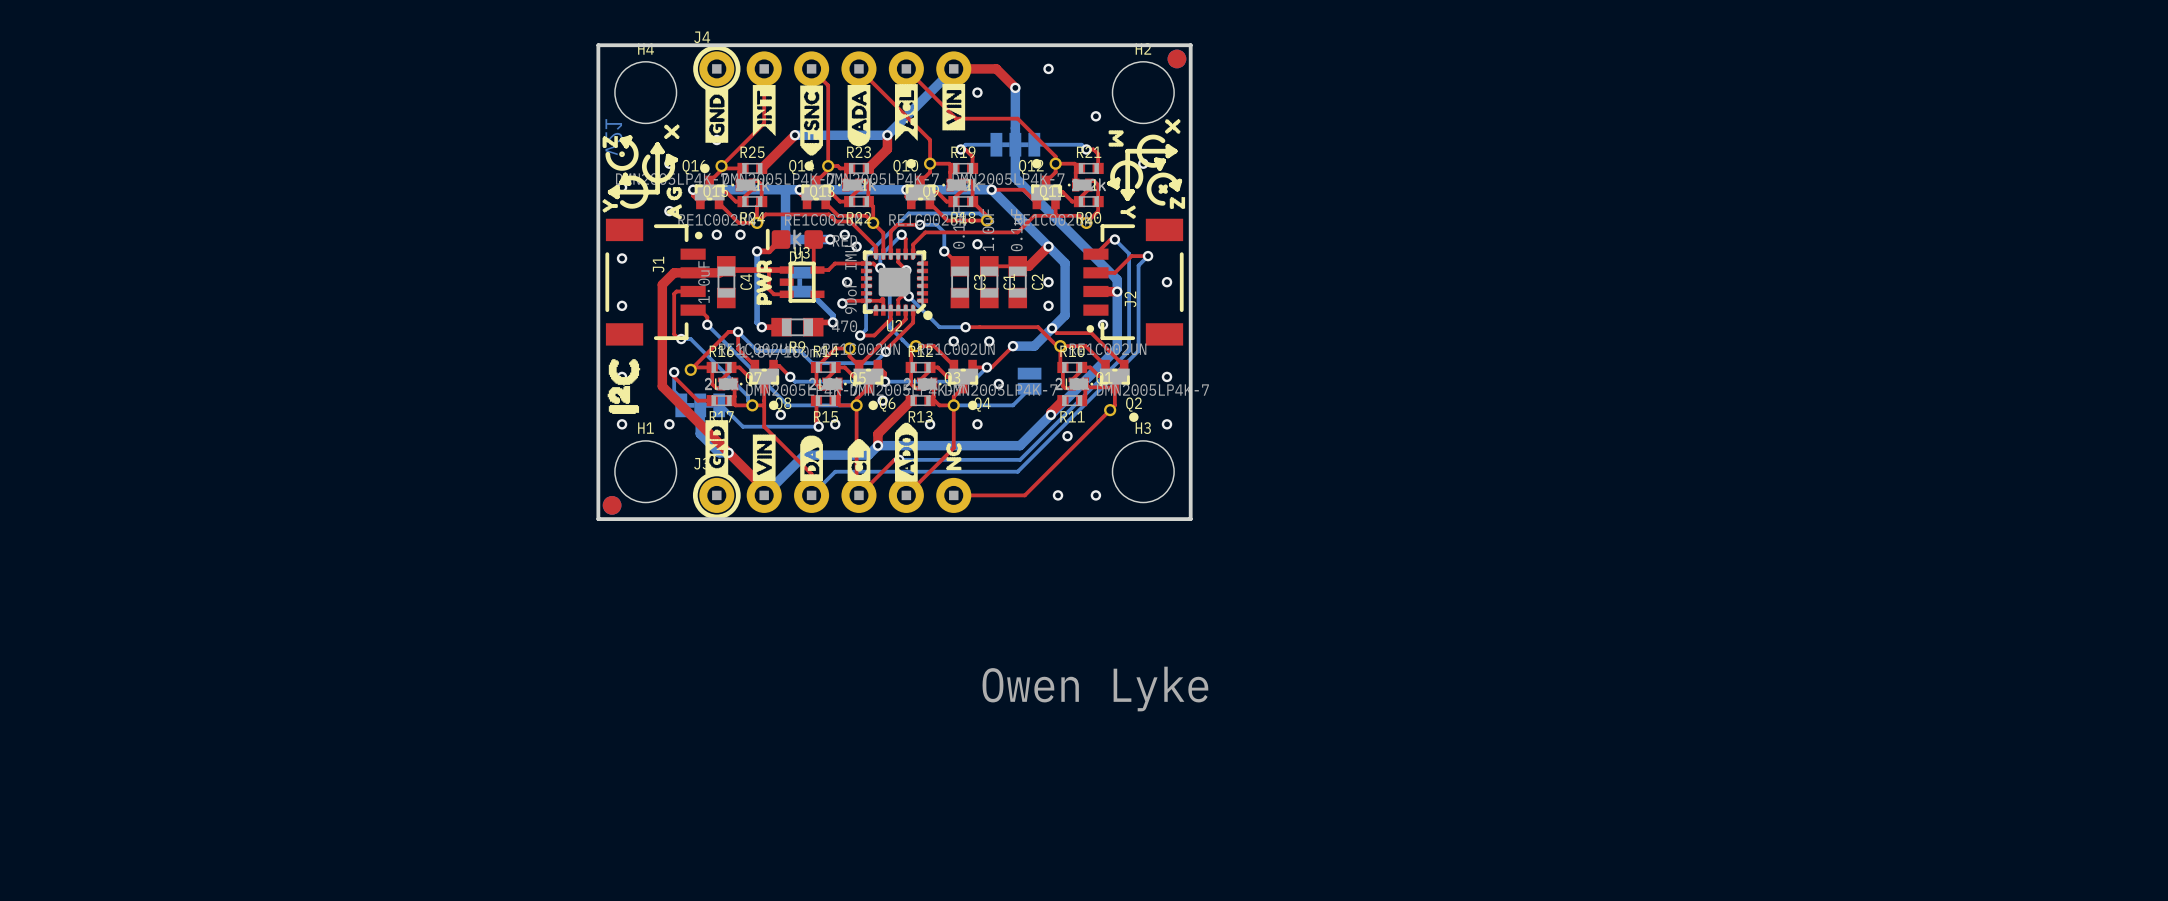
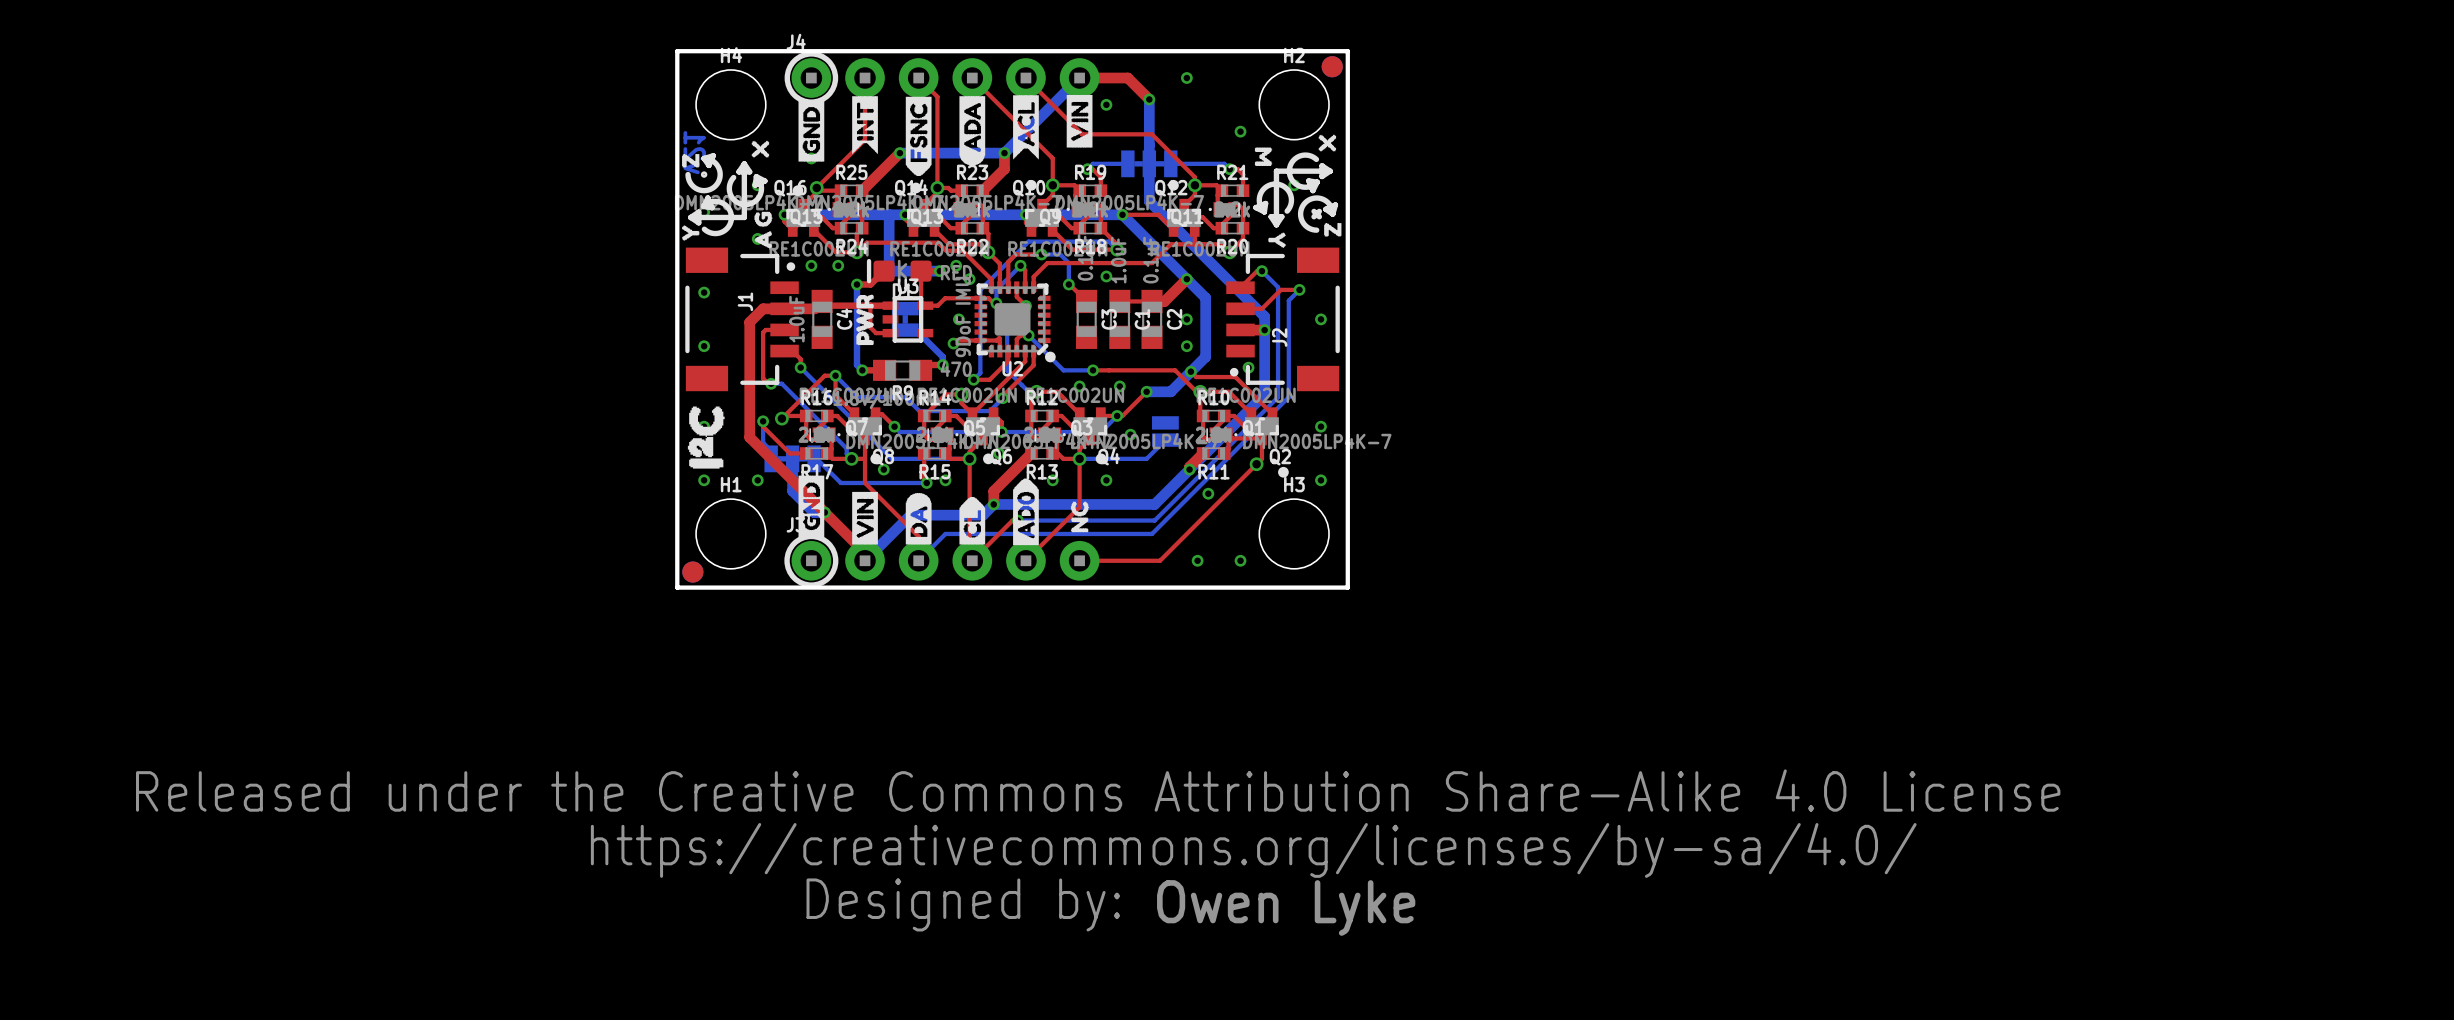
drawing: none -> [136, 769, 2061, 932]
text position: Owen Lyke (1095, 689) -> Owen Lyke (1286, 907)

